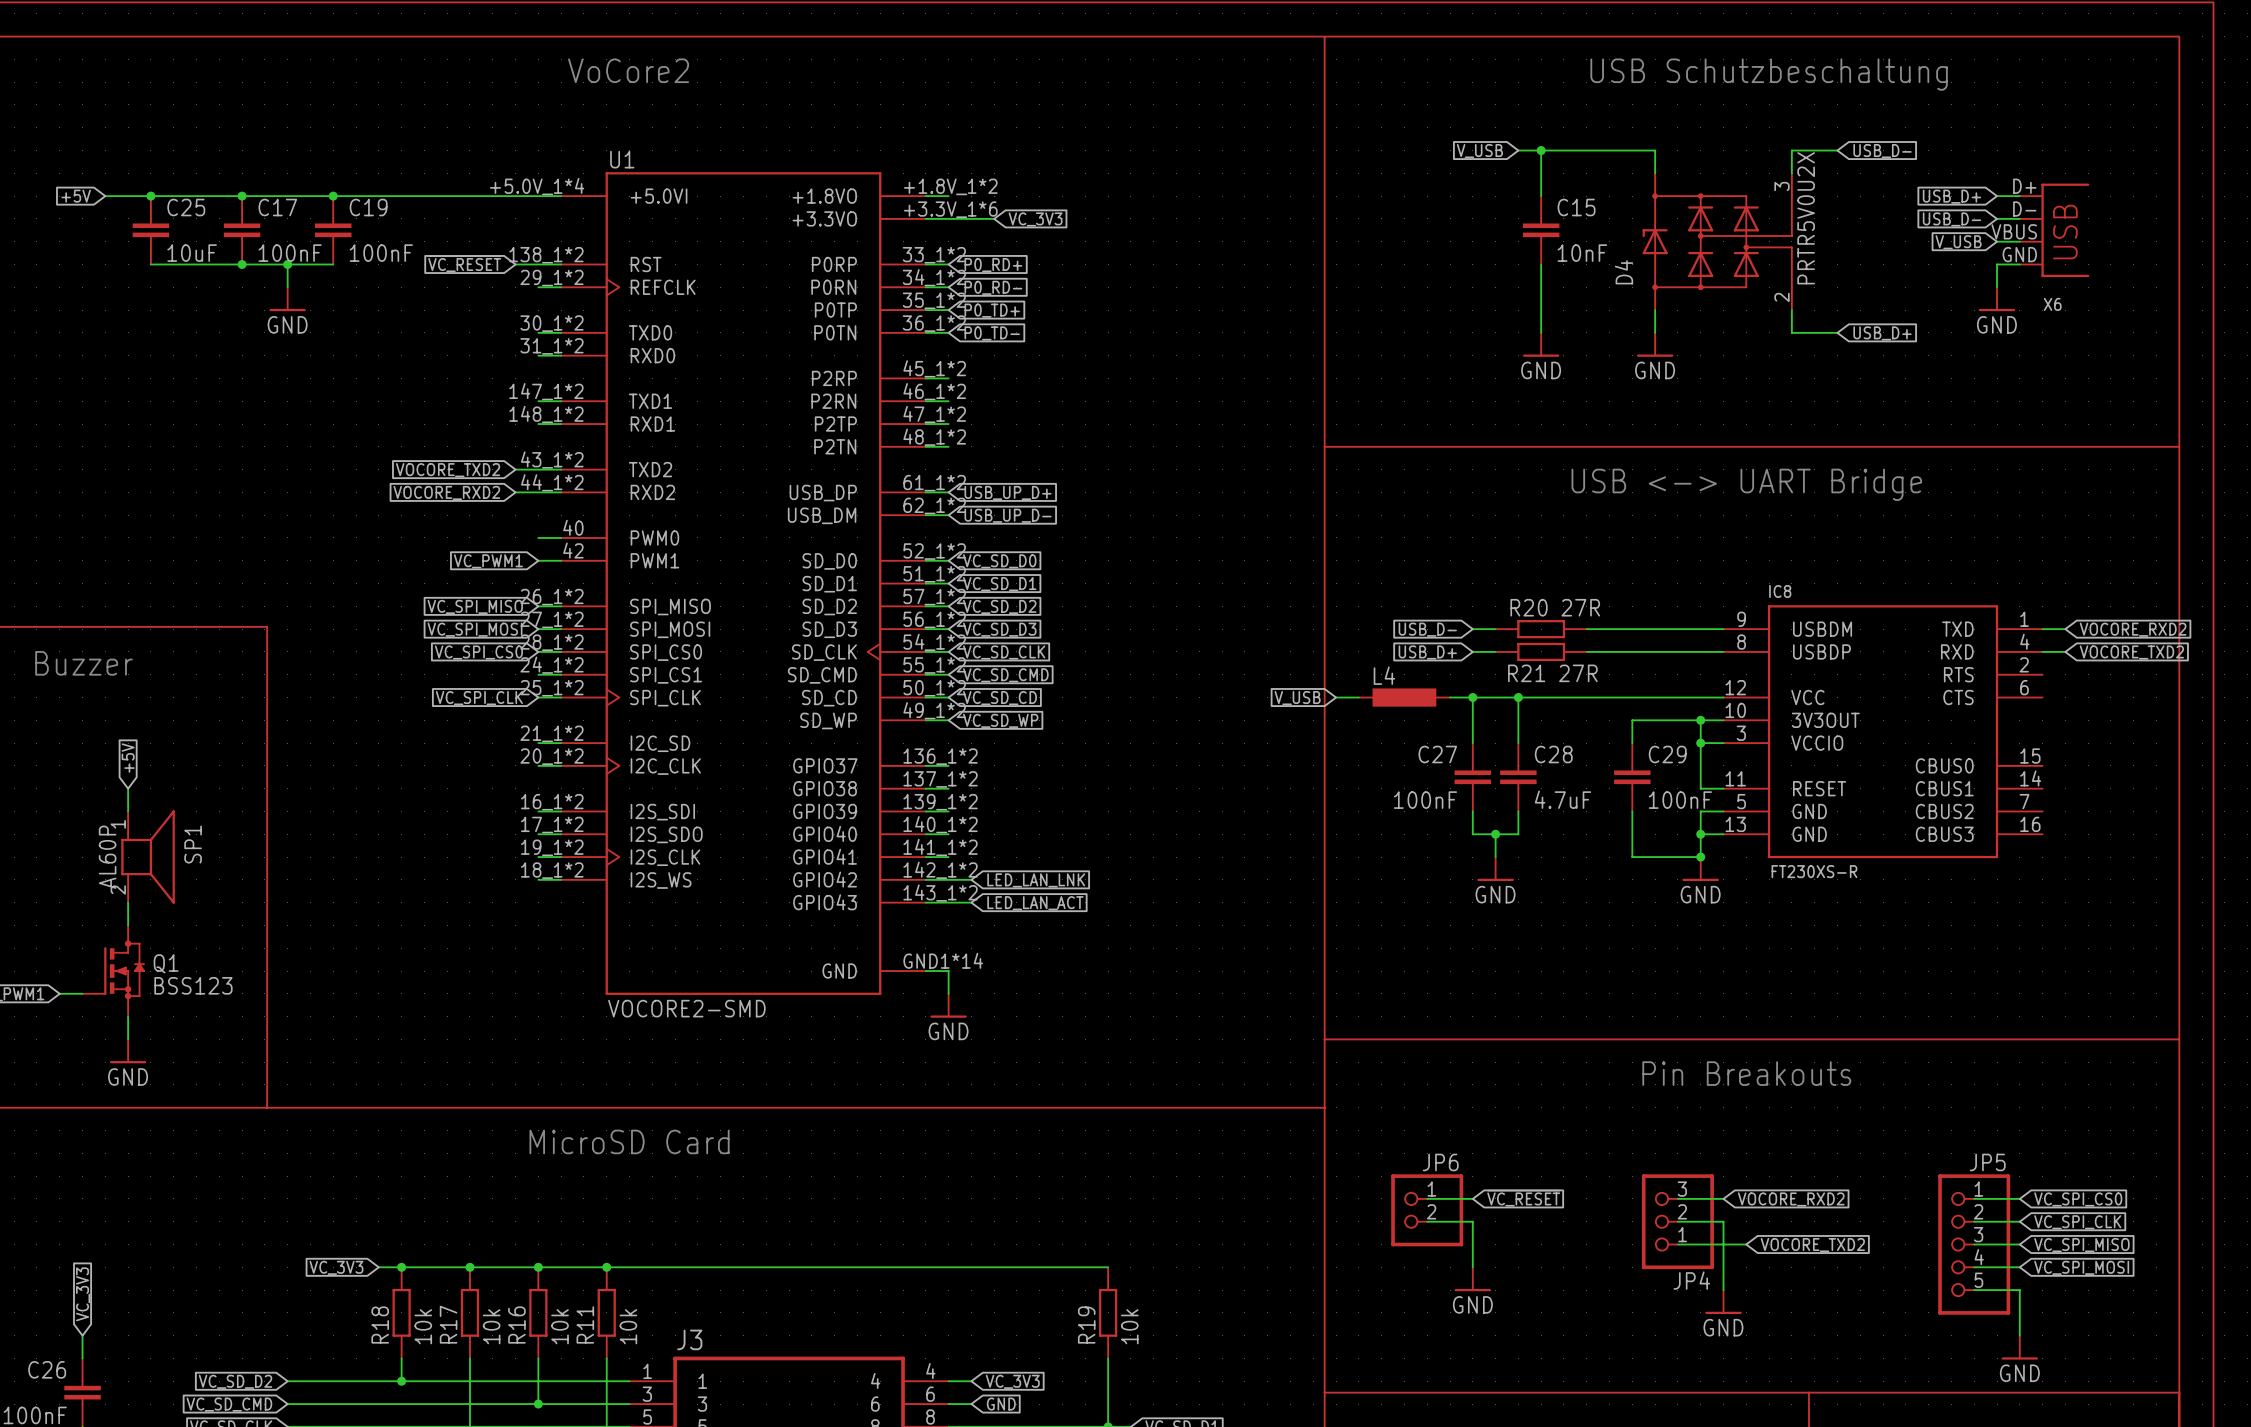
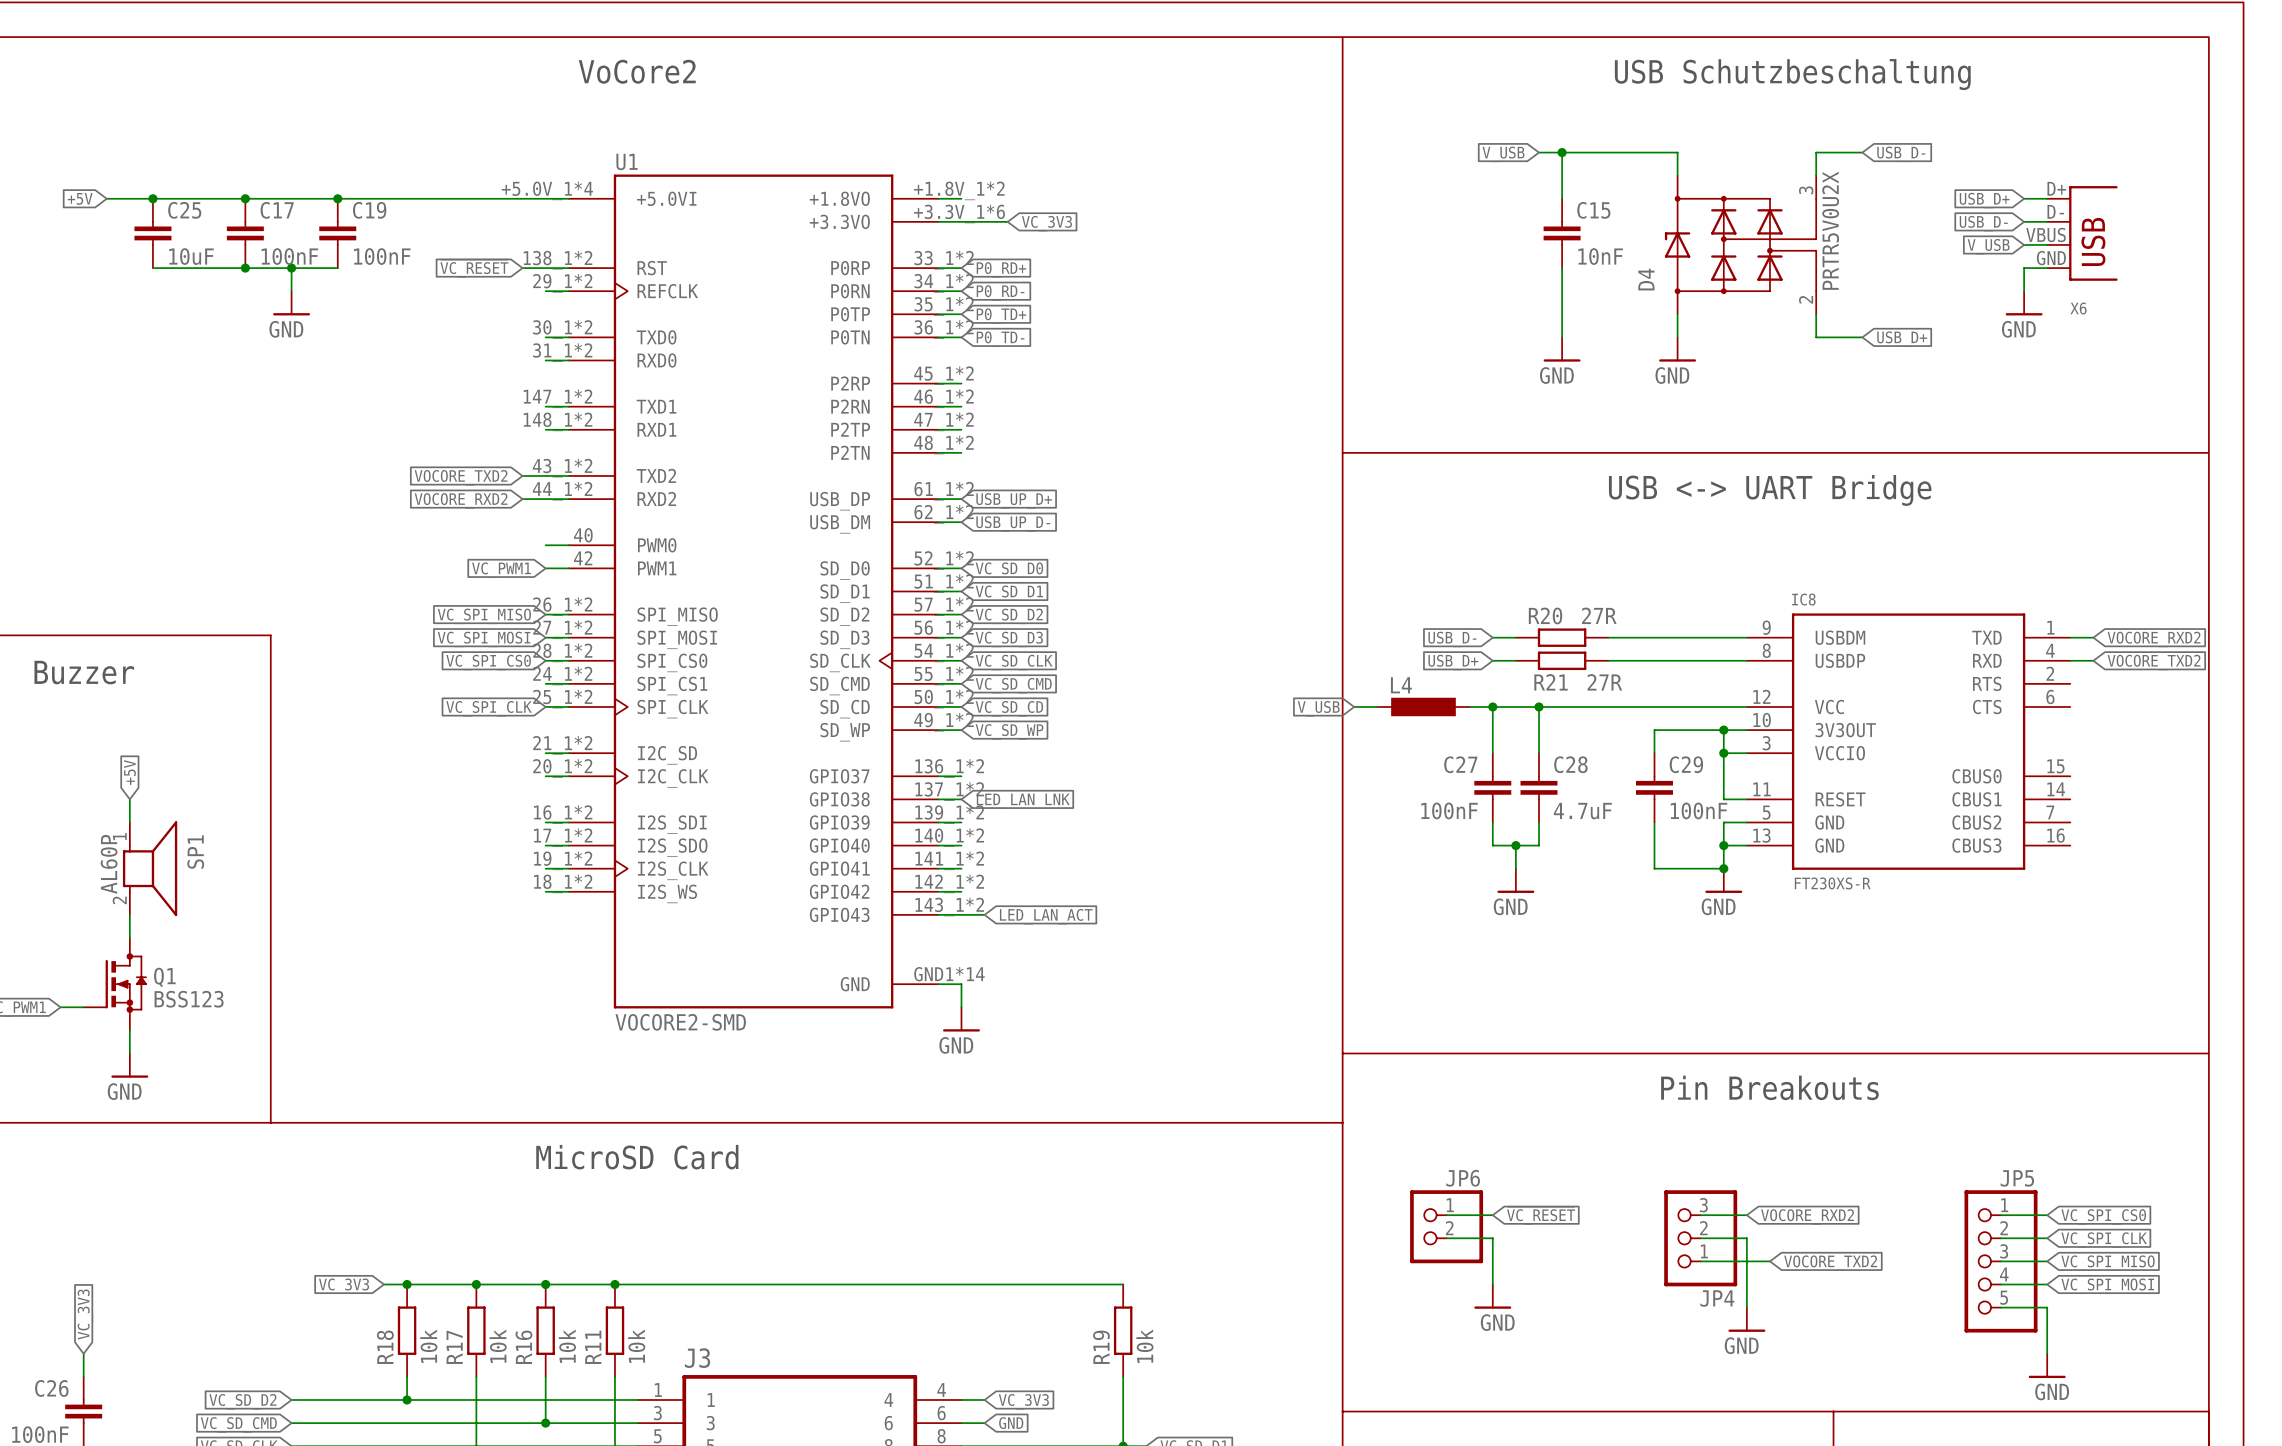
wire: (948, 879) (971, 879) -> none
global label position: LED_LAN_LNK (1036, 880) -> LED_LAN_LNK (1023, 801)

